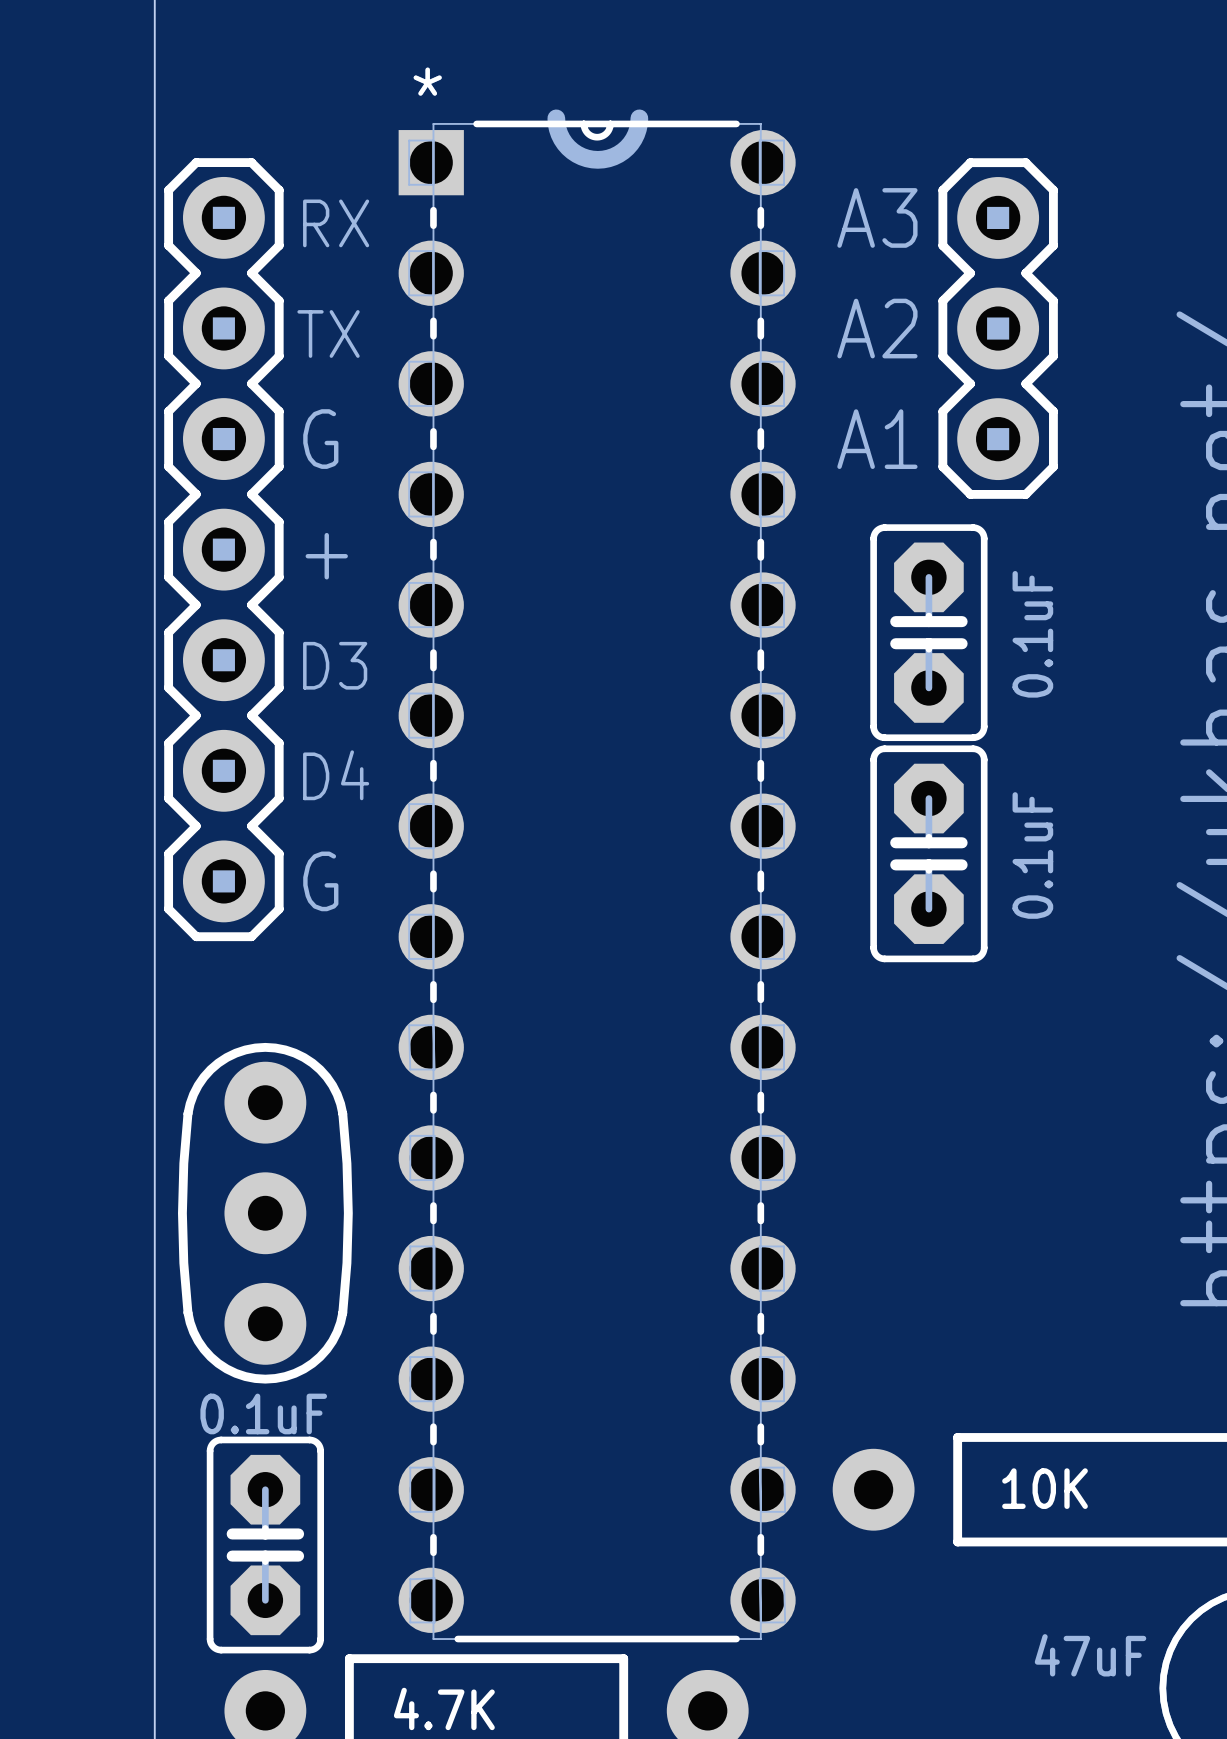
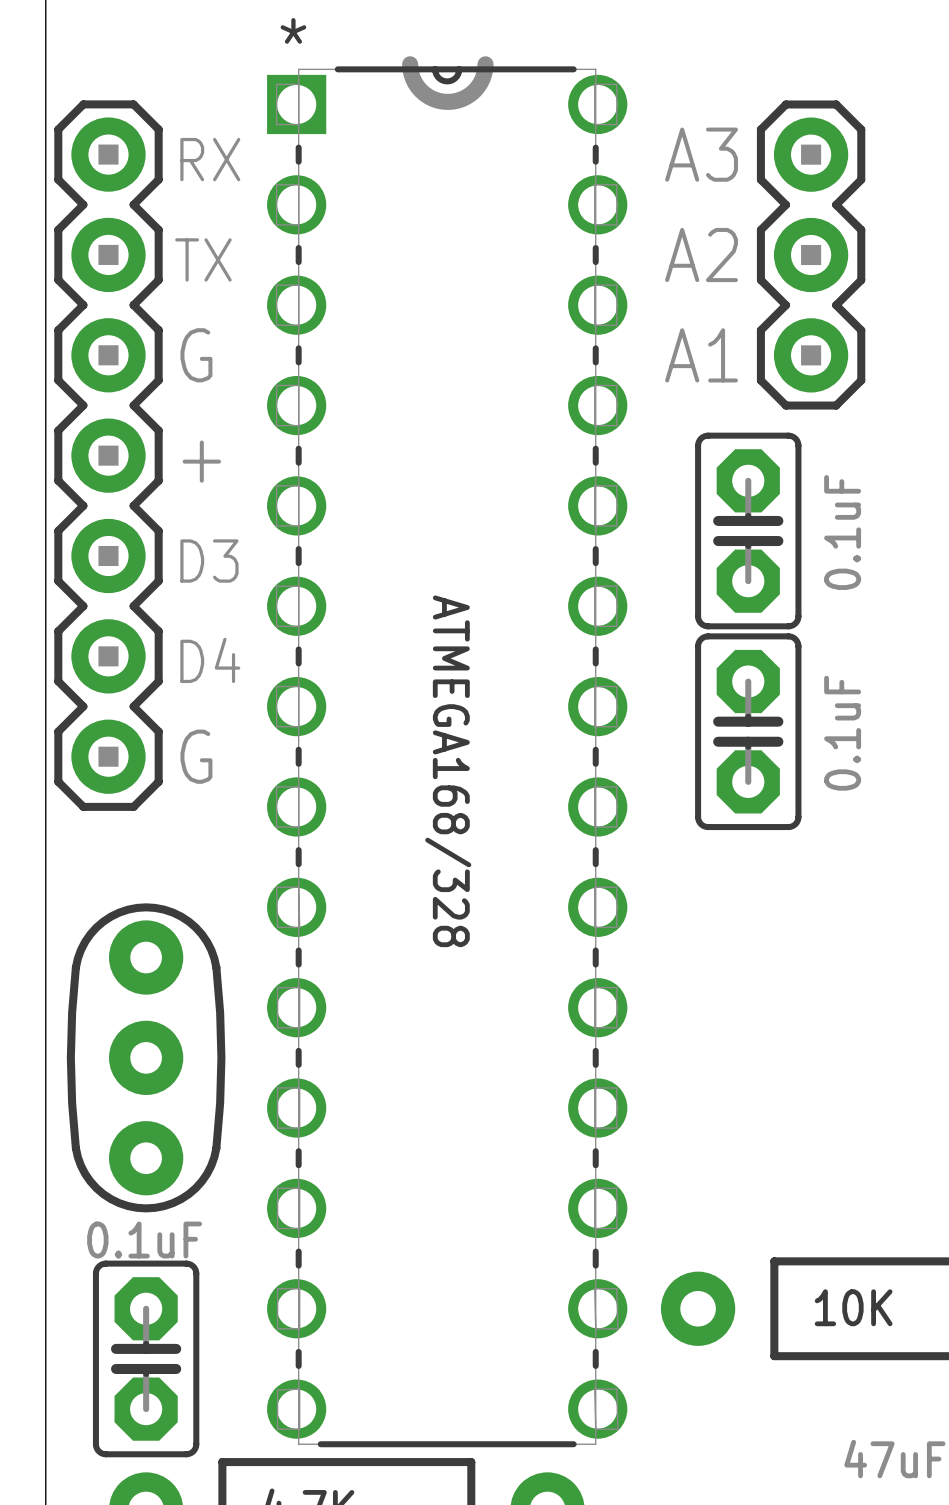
text: none -> ATMEGA168/328 (448, 771)

